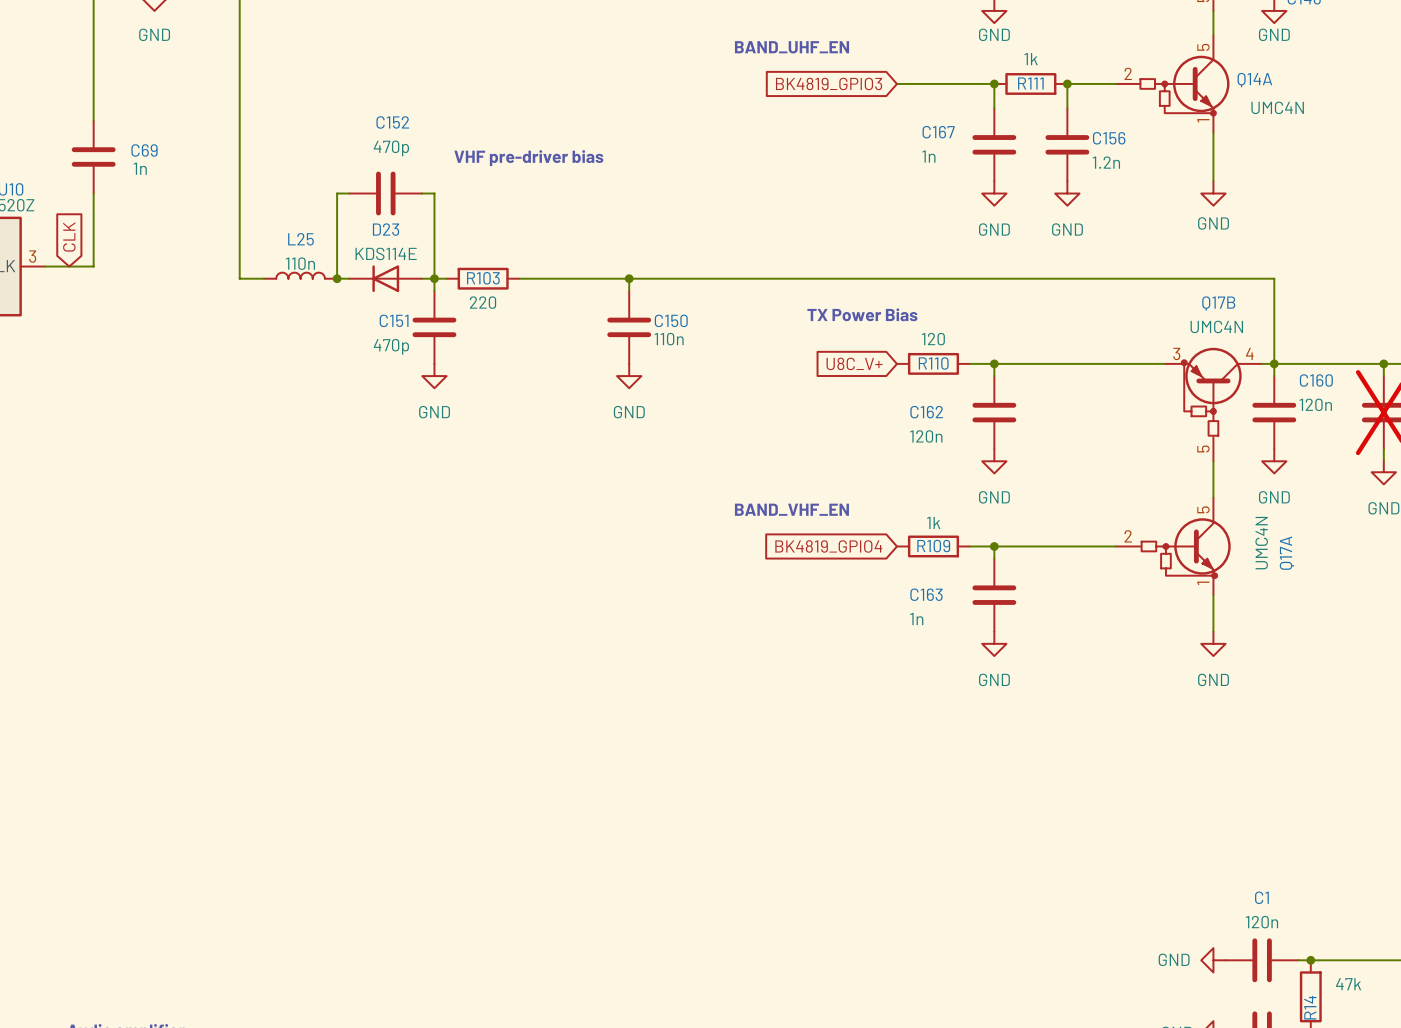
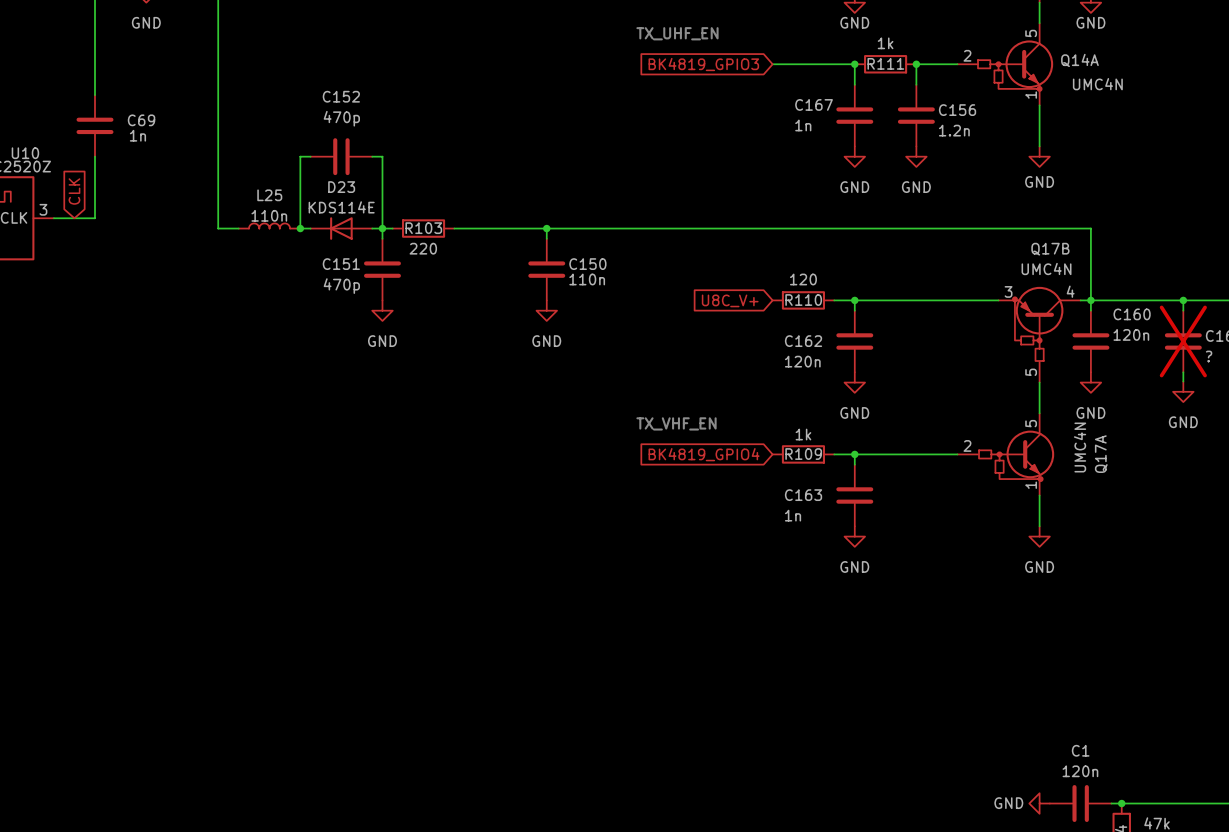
text: BAND_UHF_EN (792, 47) -> TX_UHF_EN (677, 33)
text: VHF pre-driver bias (528, 158) -> none
text: TX Power Bias (862, 314) -> none
text: BAND_VHF_EN (791, 509) -> TX_VHF_EN (676, 423)

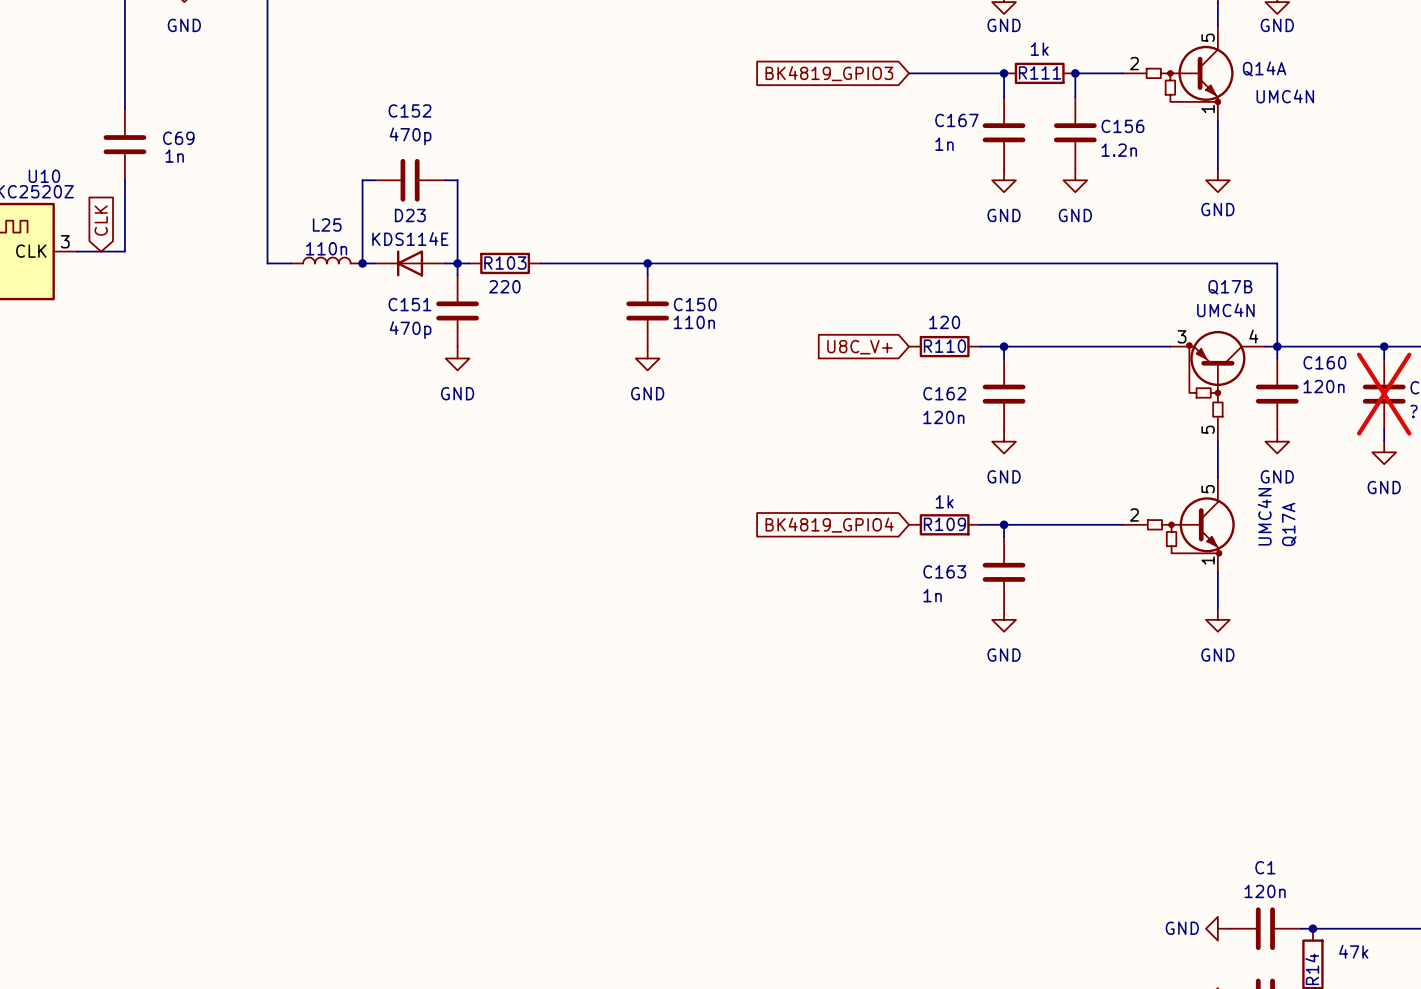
text: TX_UHF_EN (677, 33) -> none
text: TX_VHF_EN (676, 423) -> none

